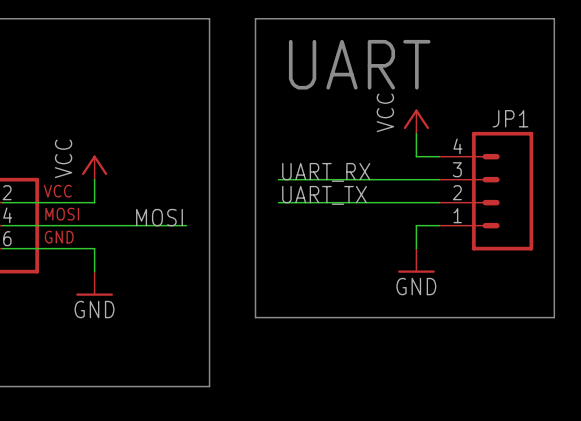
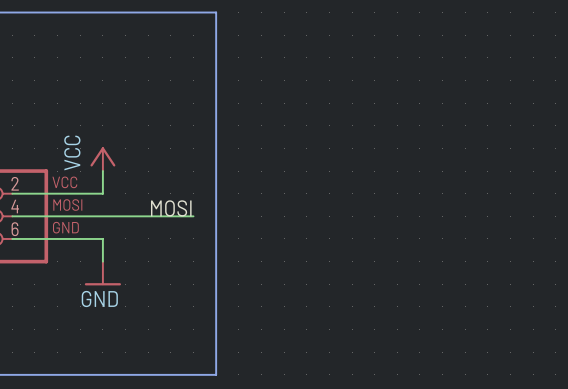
line: (255, 18) (554, 18) (554, 317) (255, 317) (255, 18) -> none
text: UART (359, 64) -> none
power symbol: VCC (416, 121) -> none
wire: (416, 133) (416, 156) (439, 156) -> none
label: UART_RX (326, 172) -> none
wire: (278, 179) (439, 179) -> none
JP1: (486, 191) -> none
label: UART_TX (324, 195) -> none
wire: (278, 202) (439, 202) -> none
wire: (439, 225) (416, 225) (416, 248) -> none
power symbol: GND (416, 260) -> none

